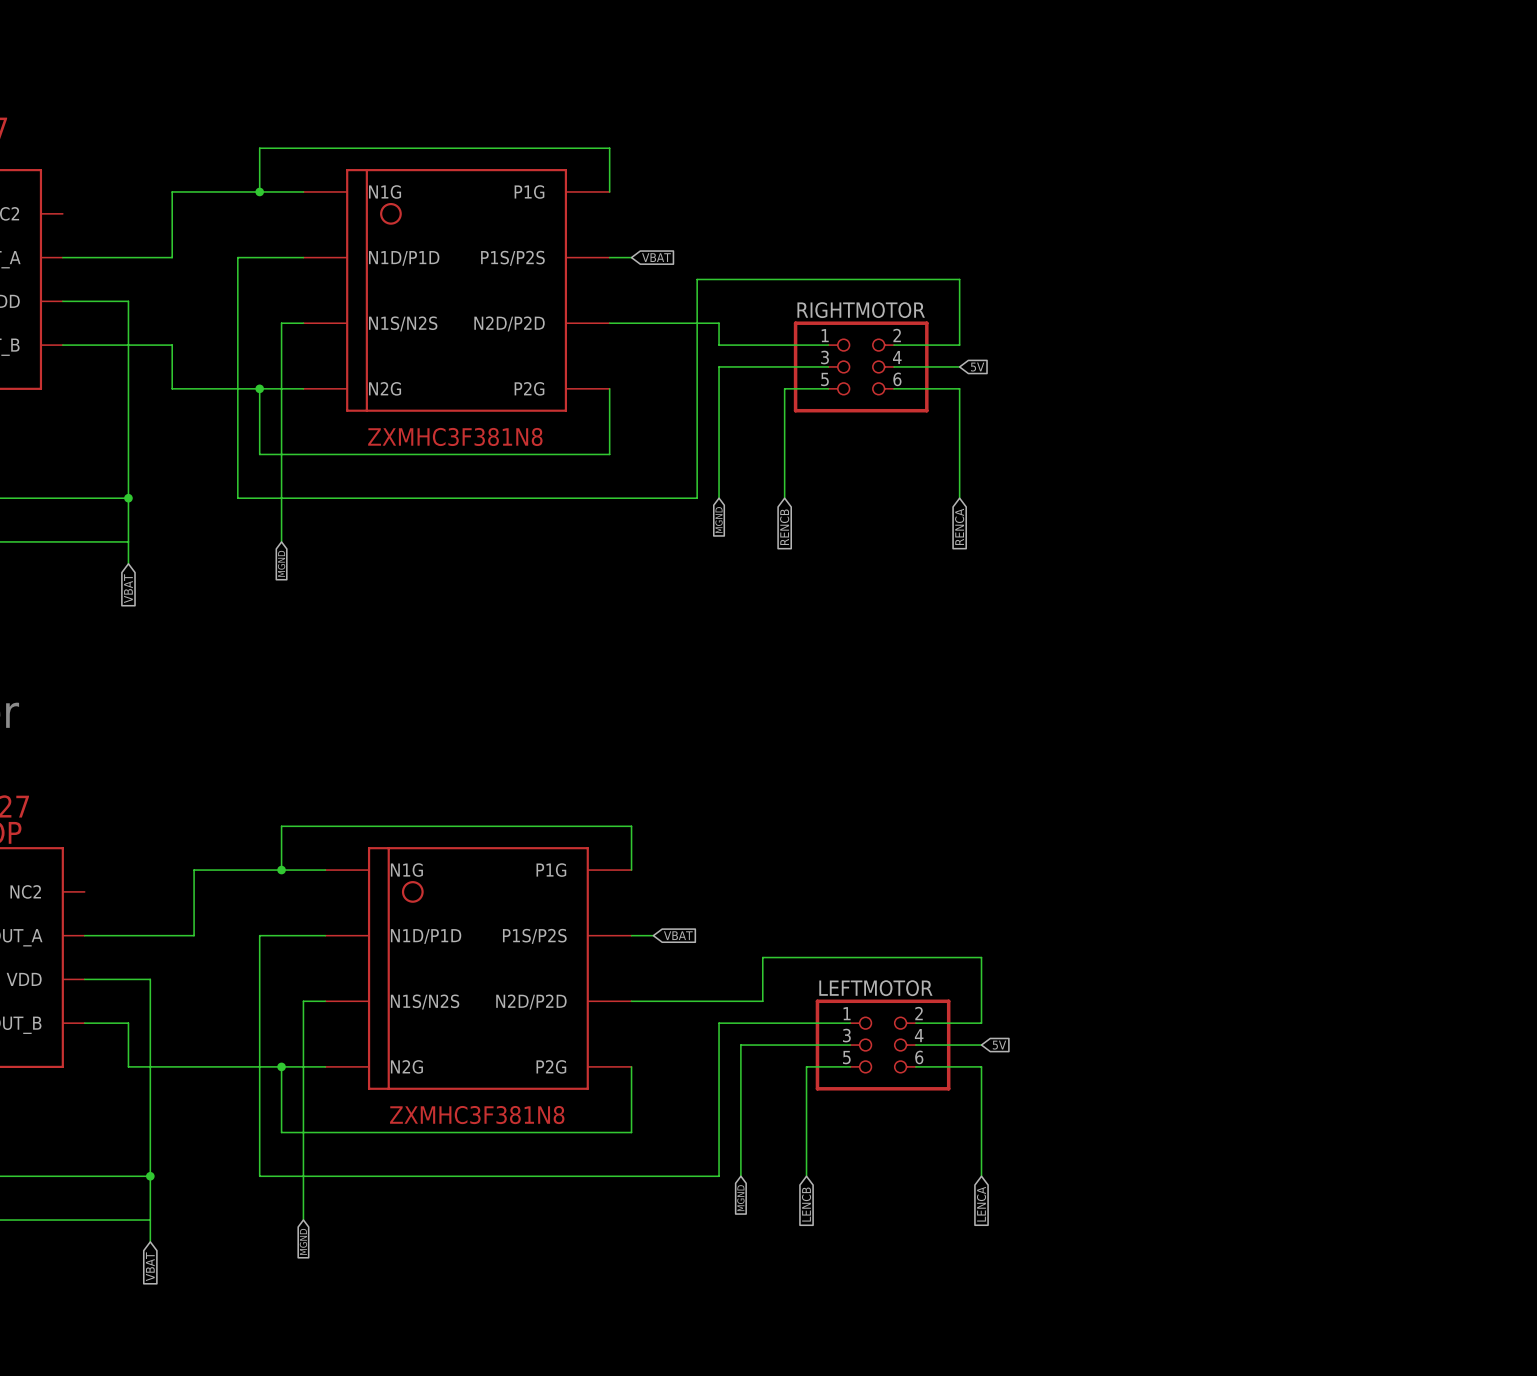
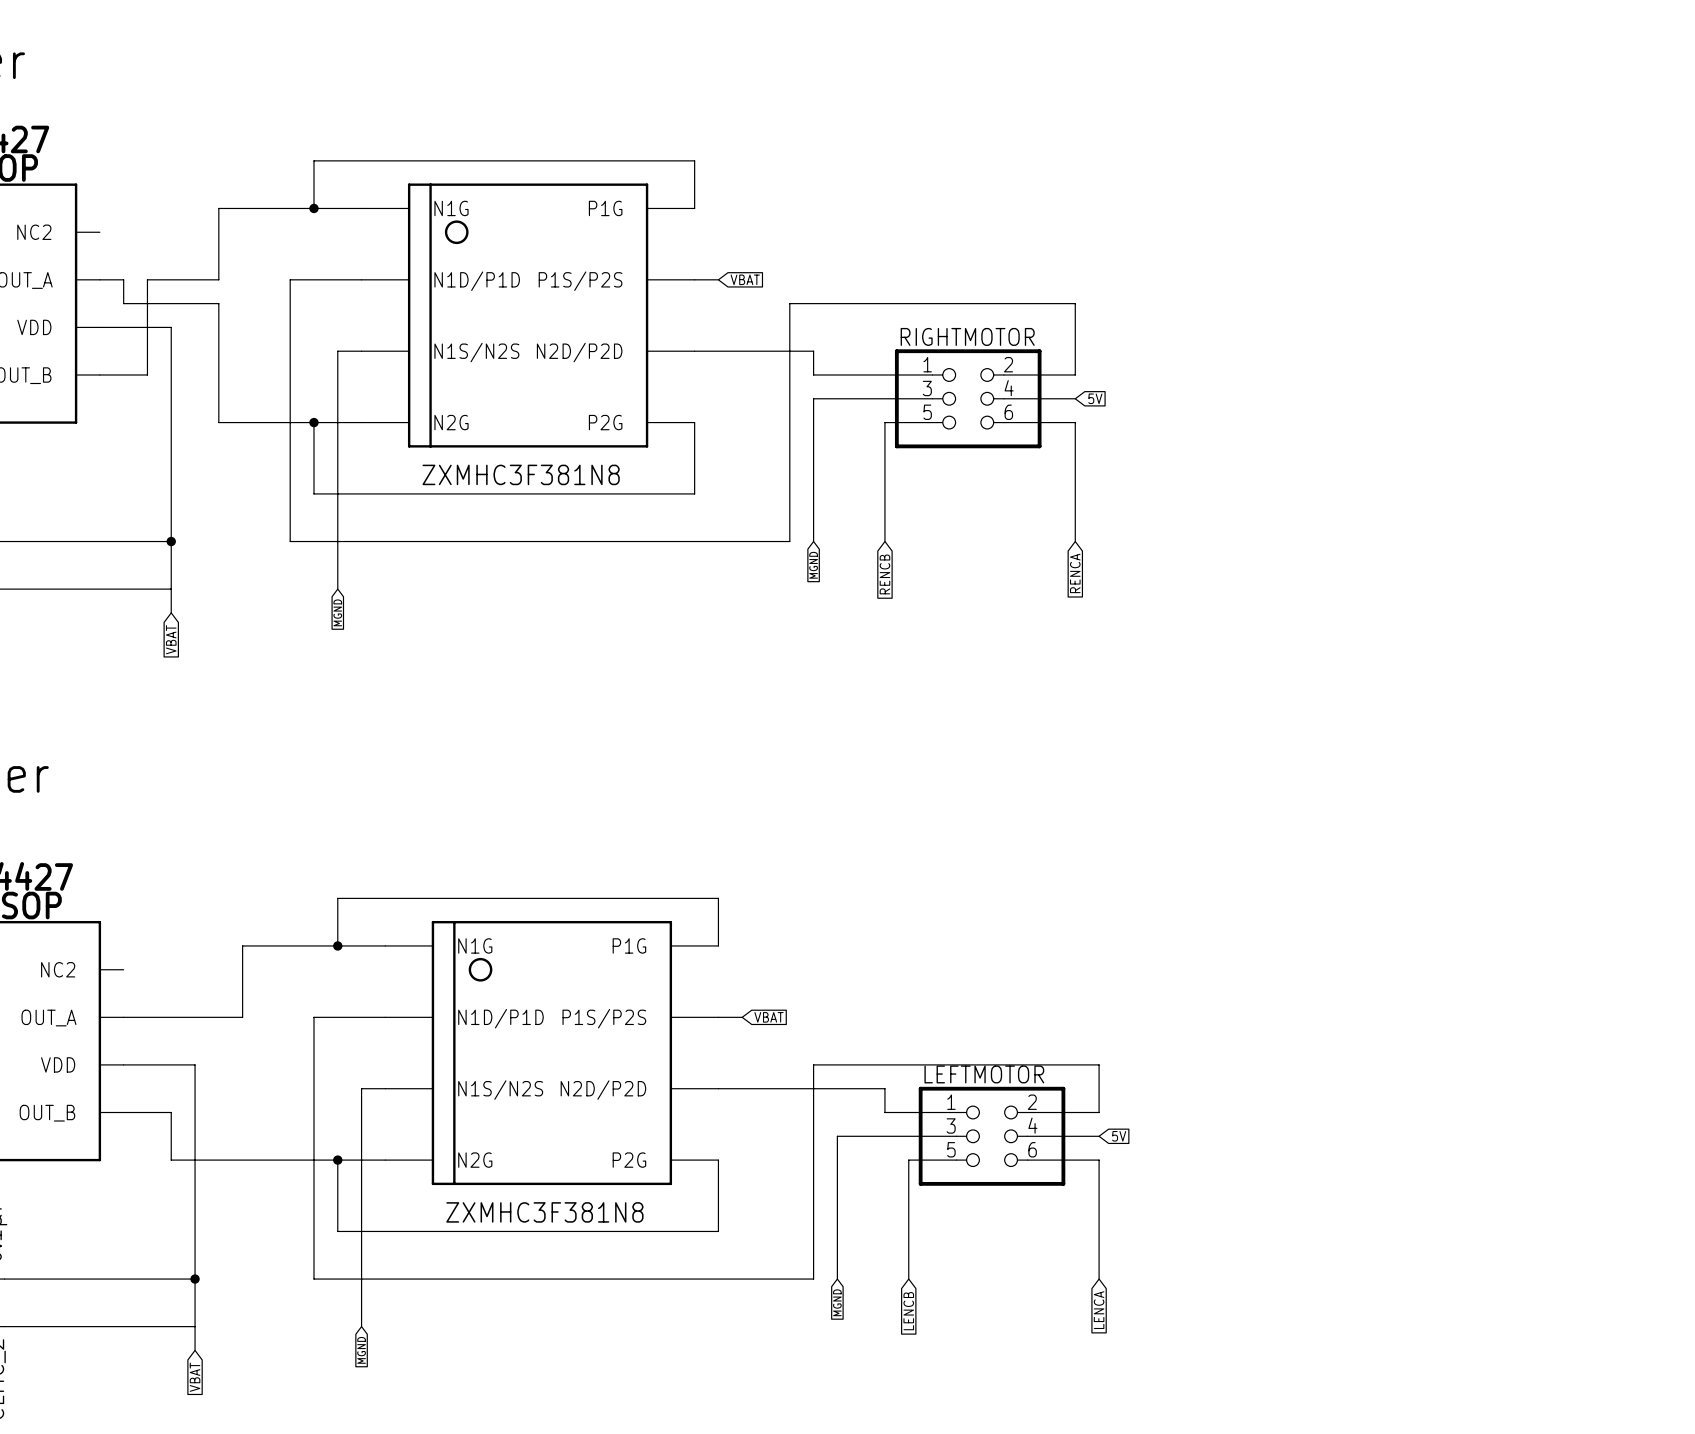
wire: (84, 257) (106, 257) -> (147, 374) (147, 279)
wire: (106, 345) (172, 345) -> (123, 279) (123, 303) (218, 303) (218, 374)
wire: (981, 979) (981, 957) (762, 957) (762, 1001) -> (1099, 1064) (813, 1064) (813, 1112)
wire: (719, 1023) (784, 1023) -> (861, 1088) (884, 1088) (884, 1112)

